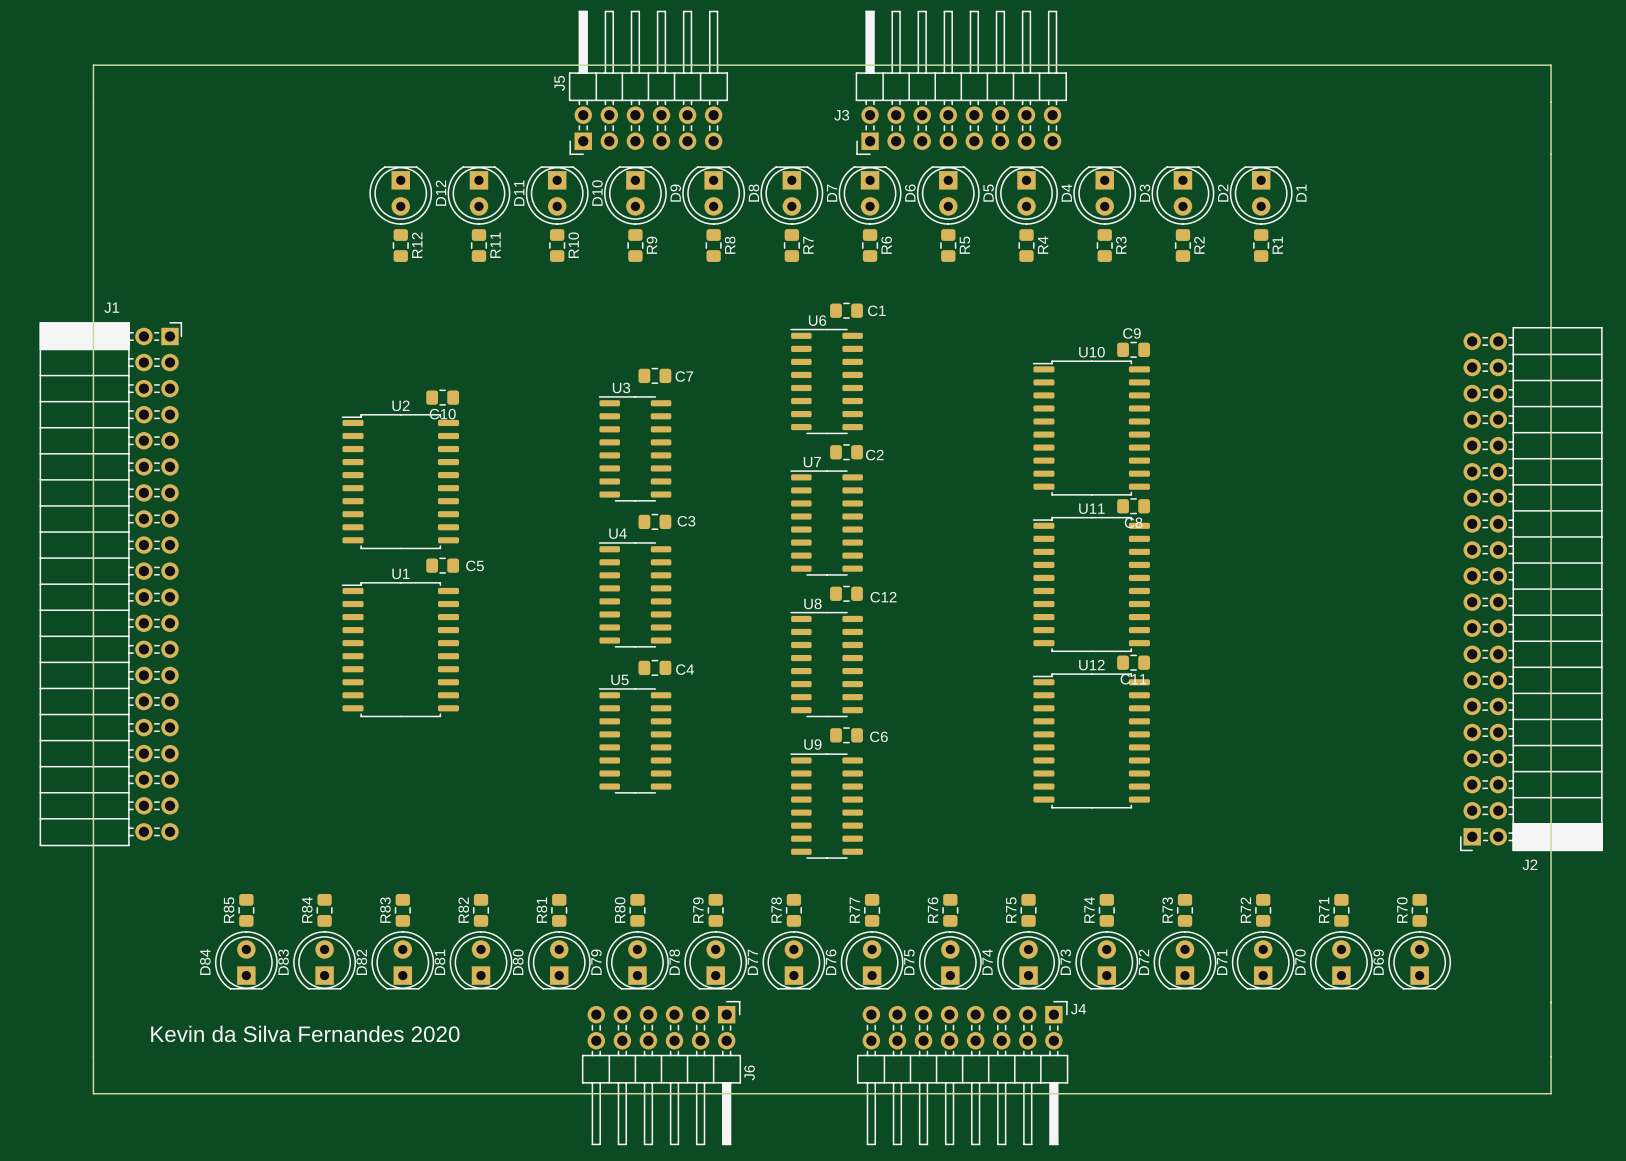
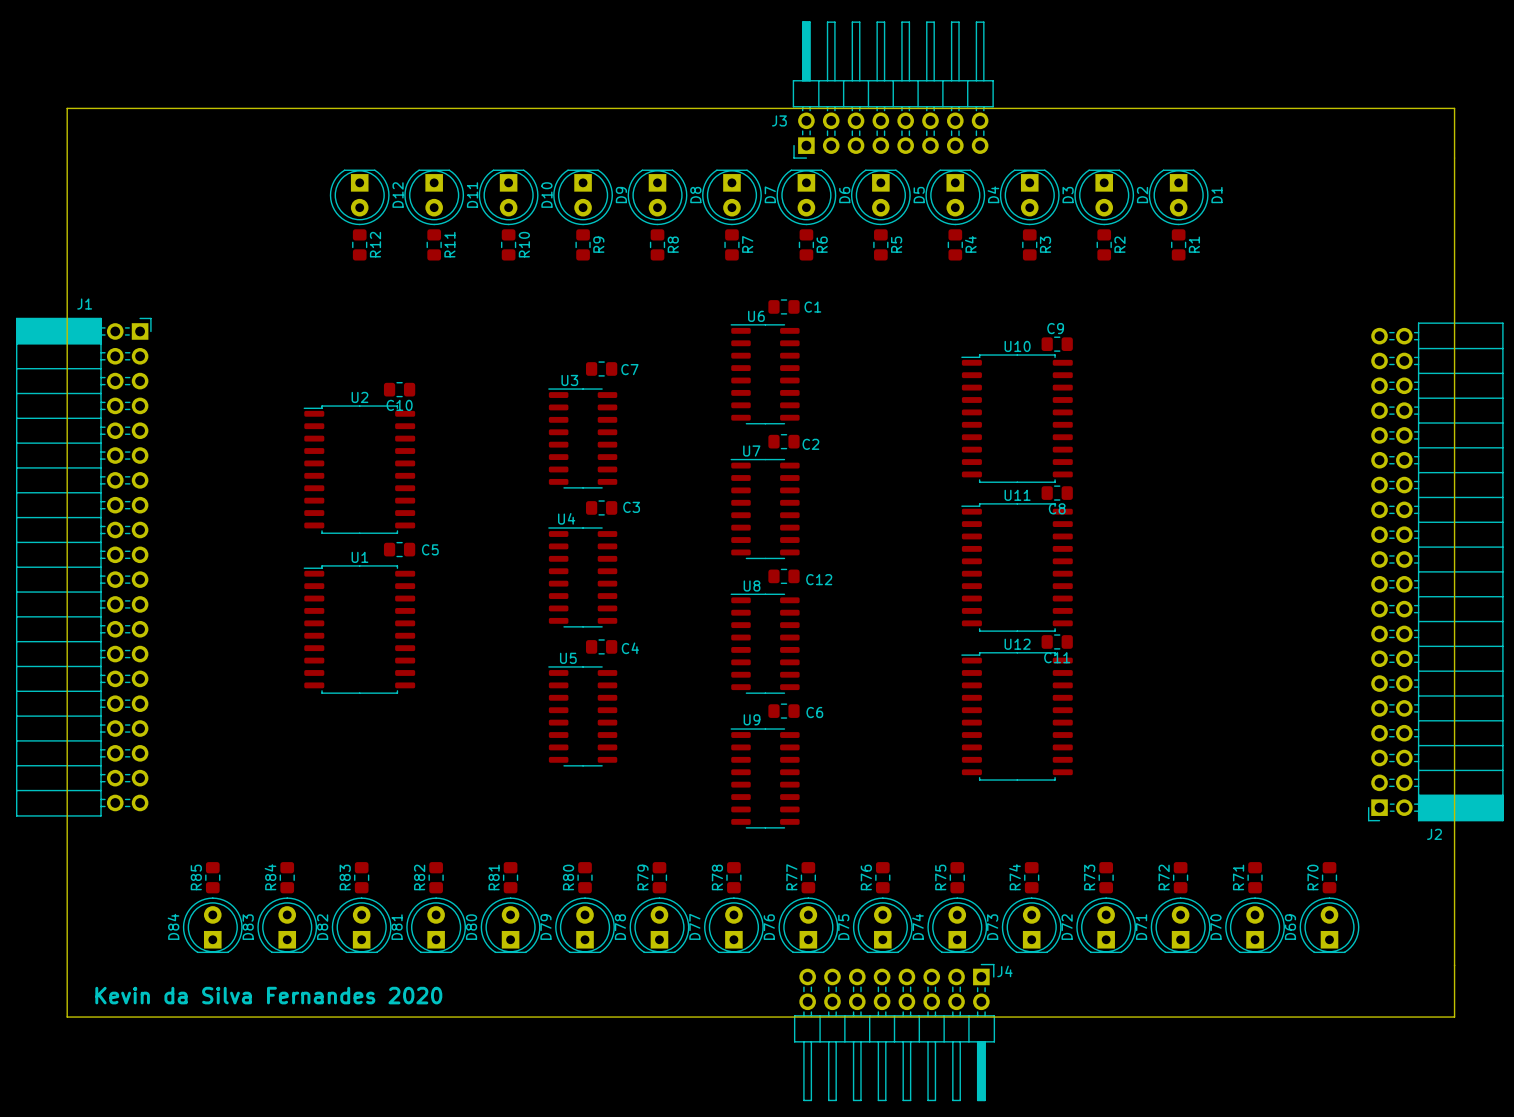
J5: (648, 82) -> none
board edge: (93, 102) (93, 65) (1551, 65) (1551, 102) -> (67, 108) (1454, 108)
board edge: (93, 1056) (93, 1093) (1551, 1093) (1551, 1056) -> (67, 1017) (1454, 1017)
J6: (661, 1073) -> none

